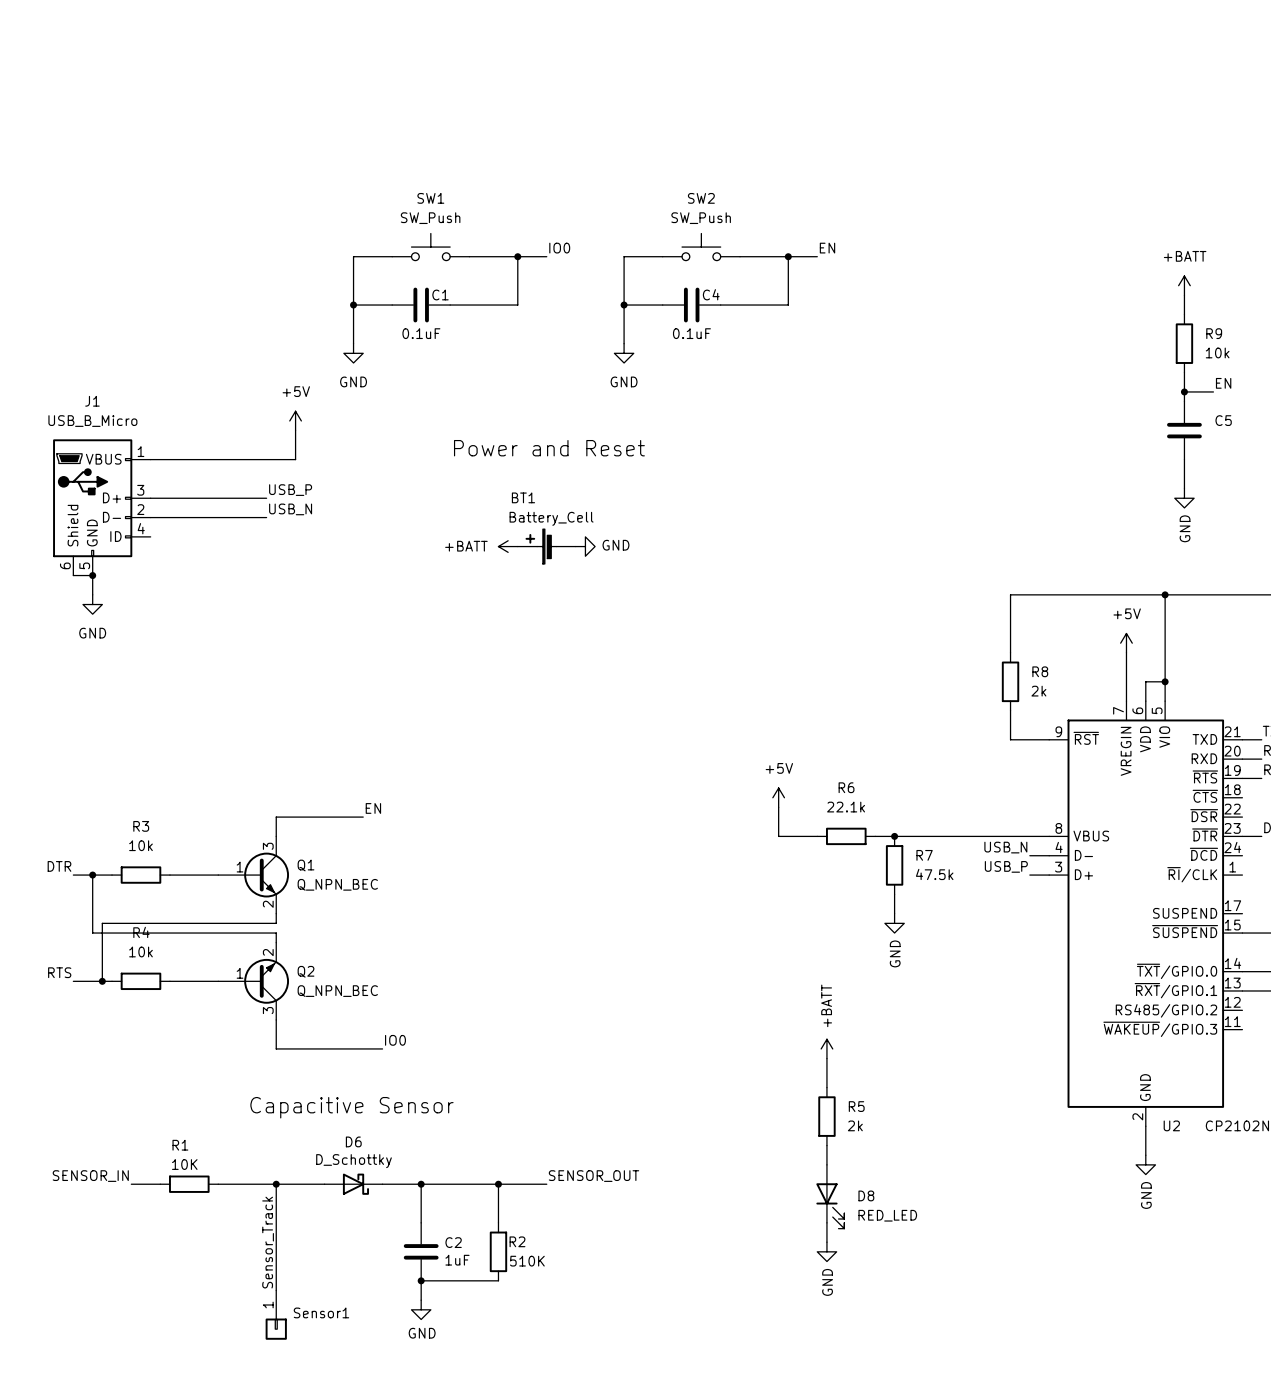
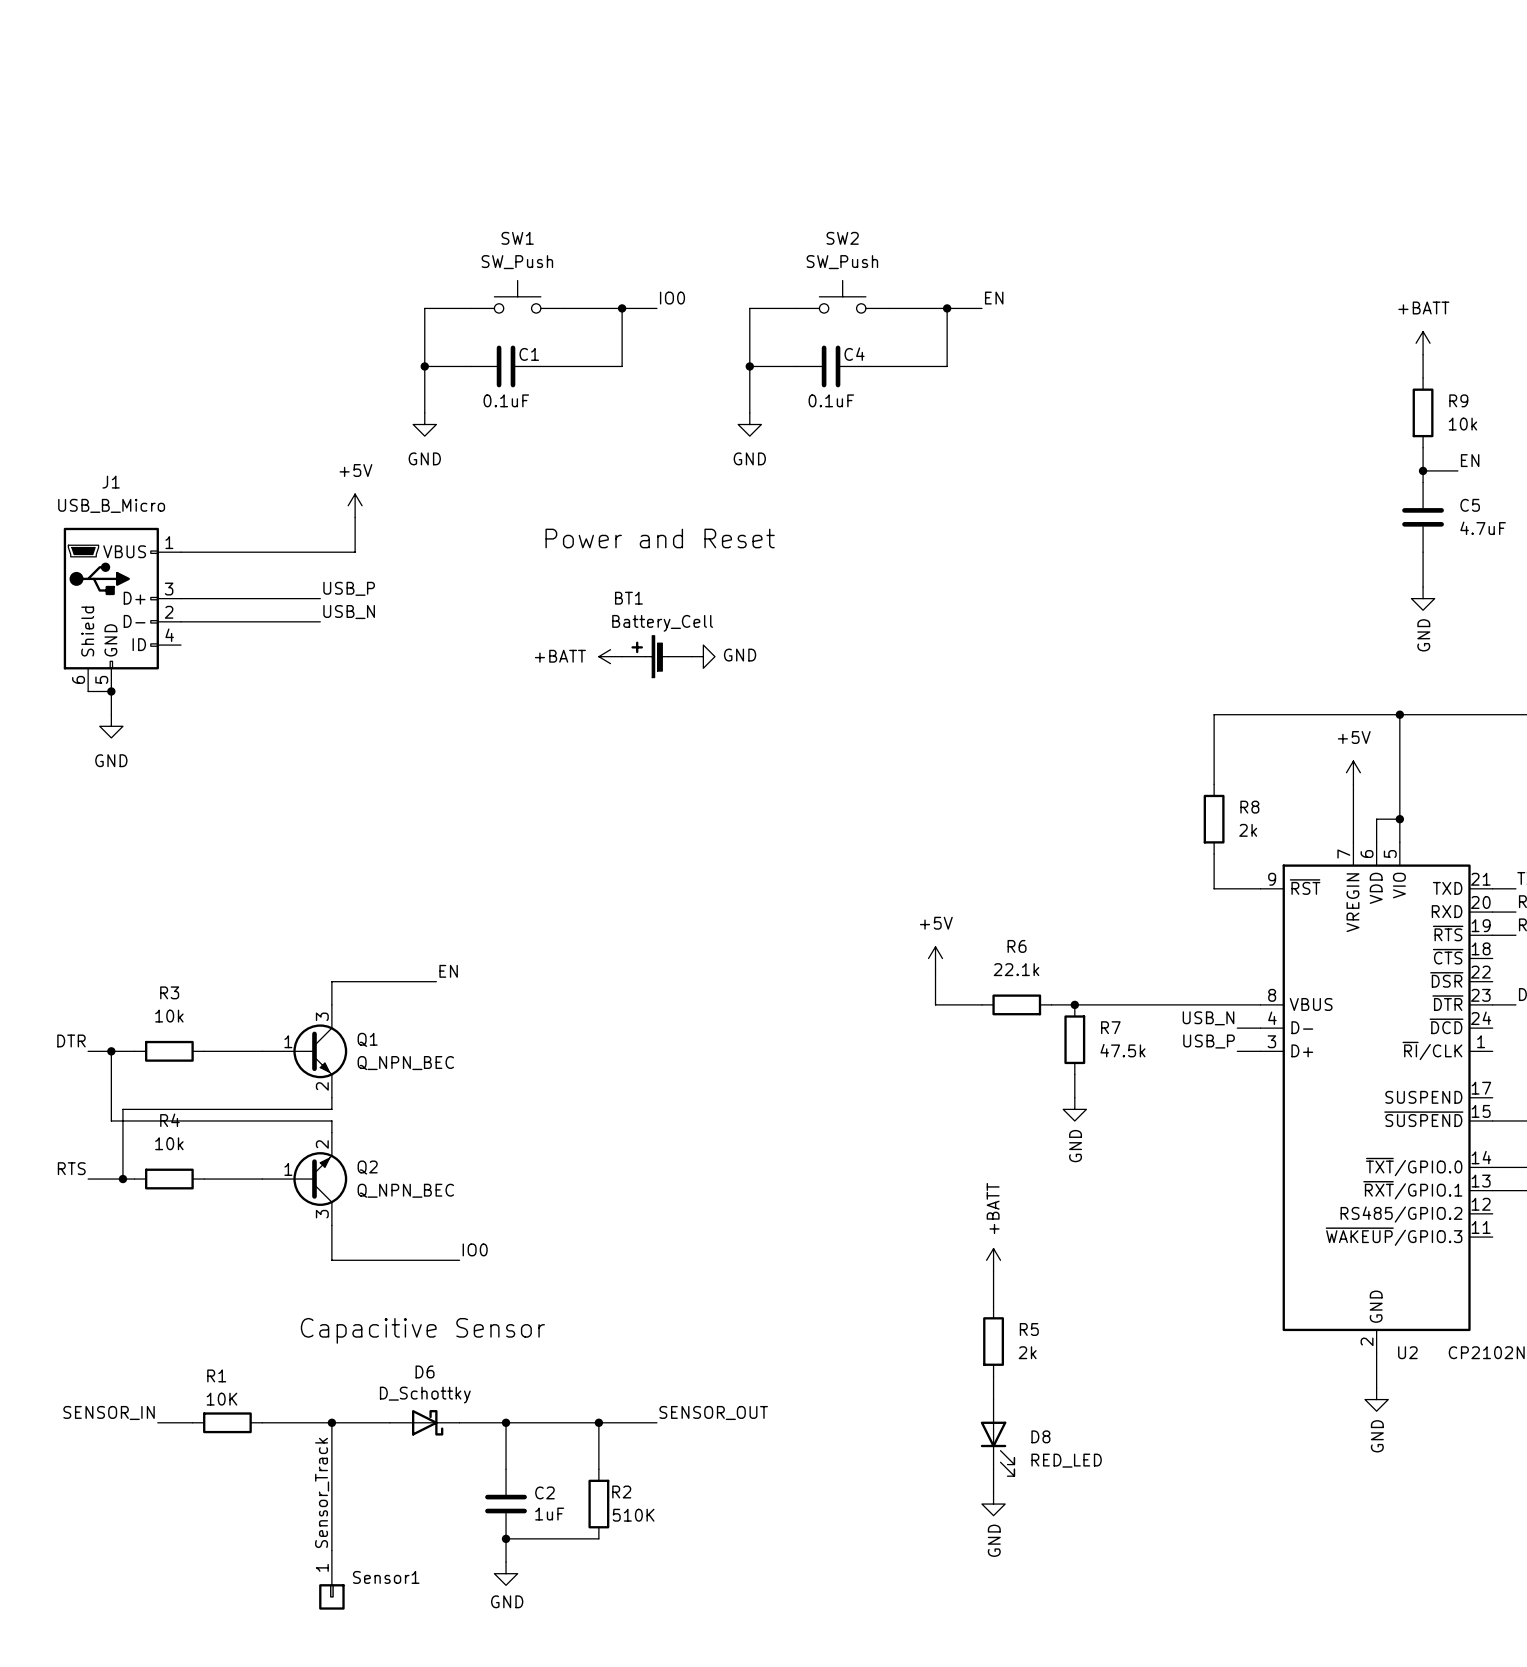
C5 value: none -> 4.7uF (1483, 528)

